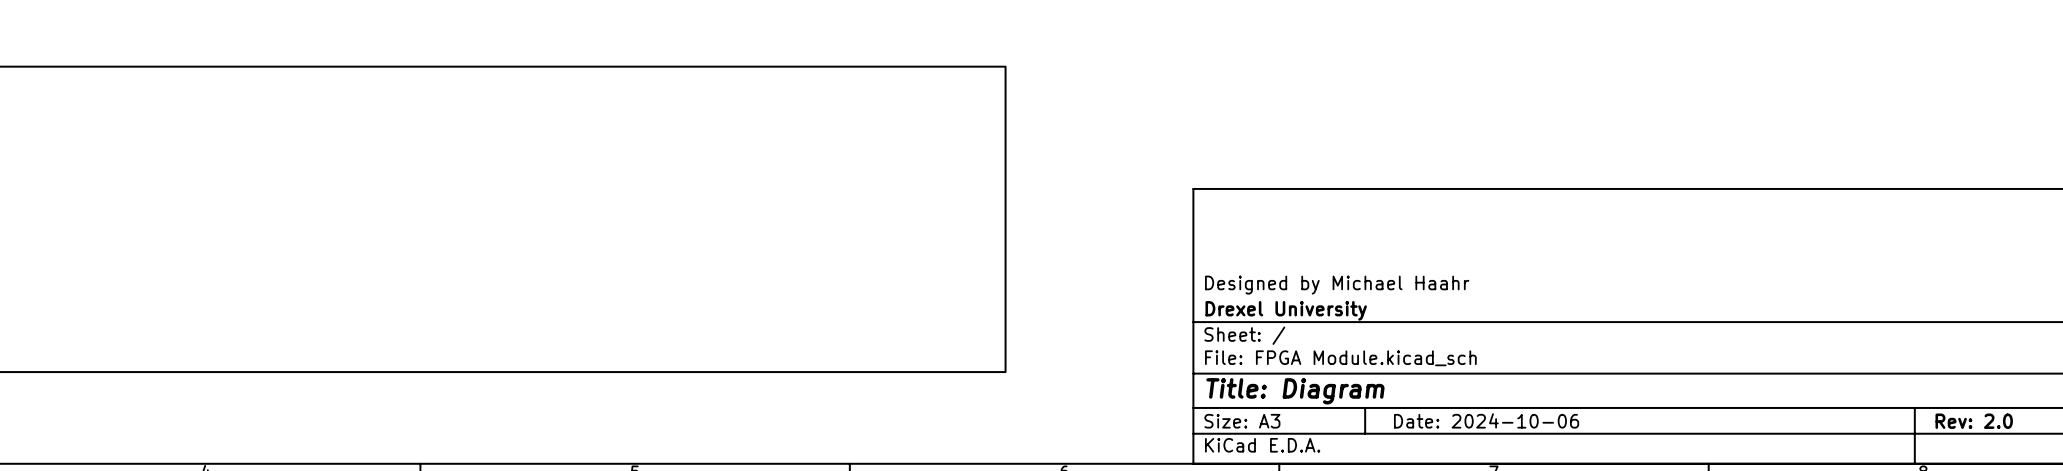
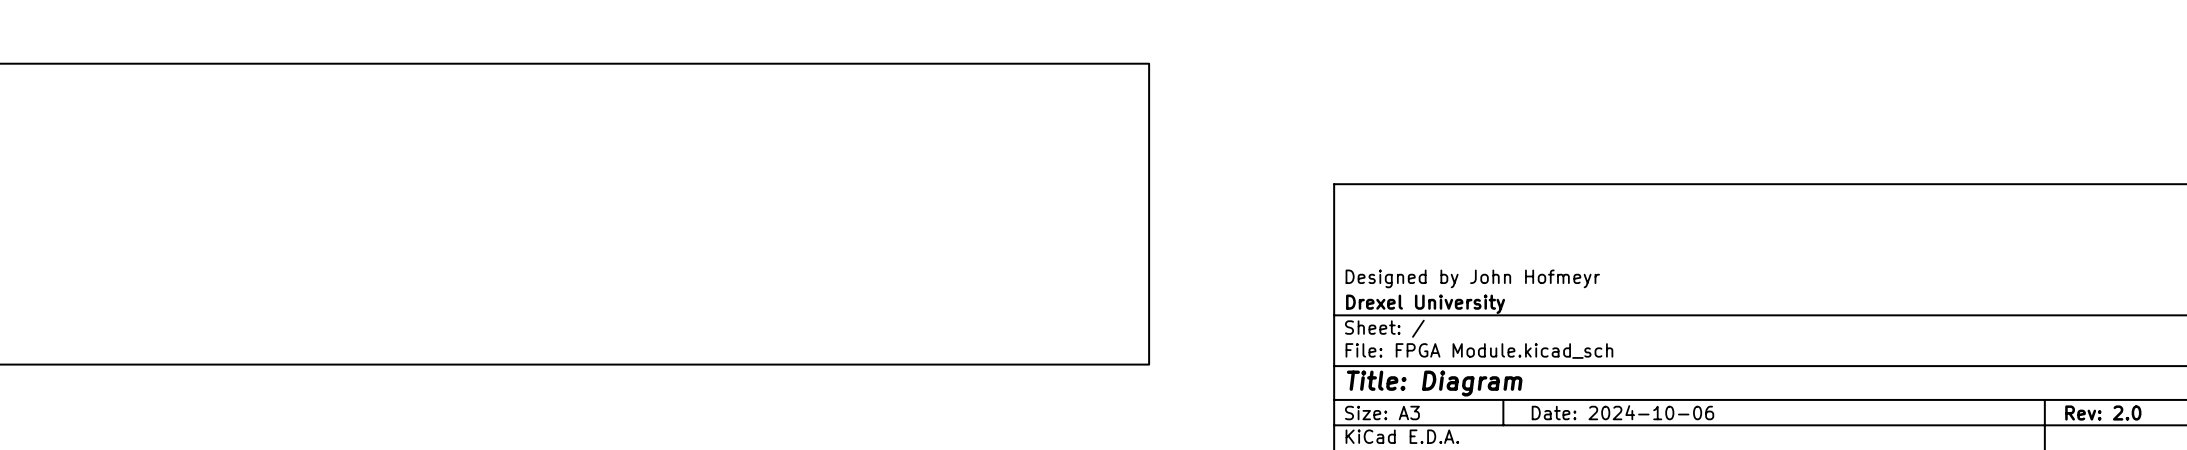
title block: Designed by Michael Haahr (1337, 285) -> Designed by John Hofmeyr (1472, 278)

